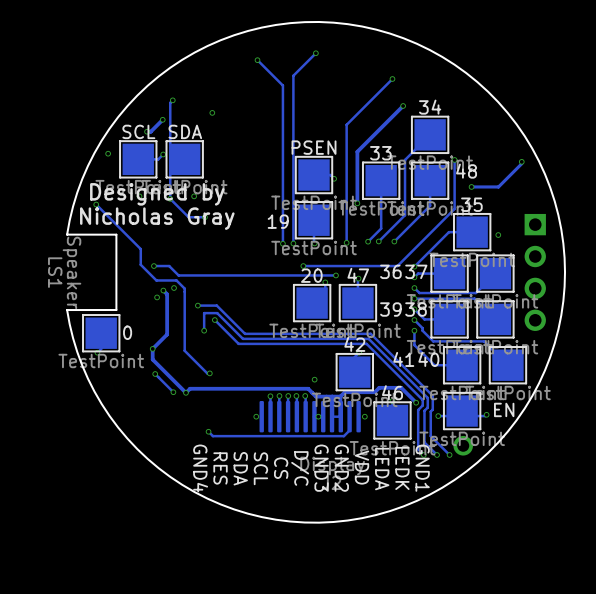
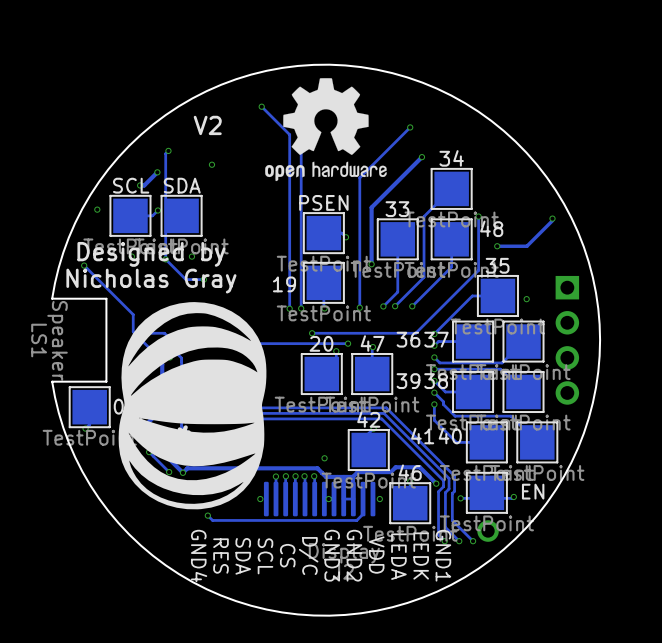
drawing: none -> [265, 78, 387, 182]
text: none -> V2 (207, 125)
part: none -> (192, 405)

